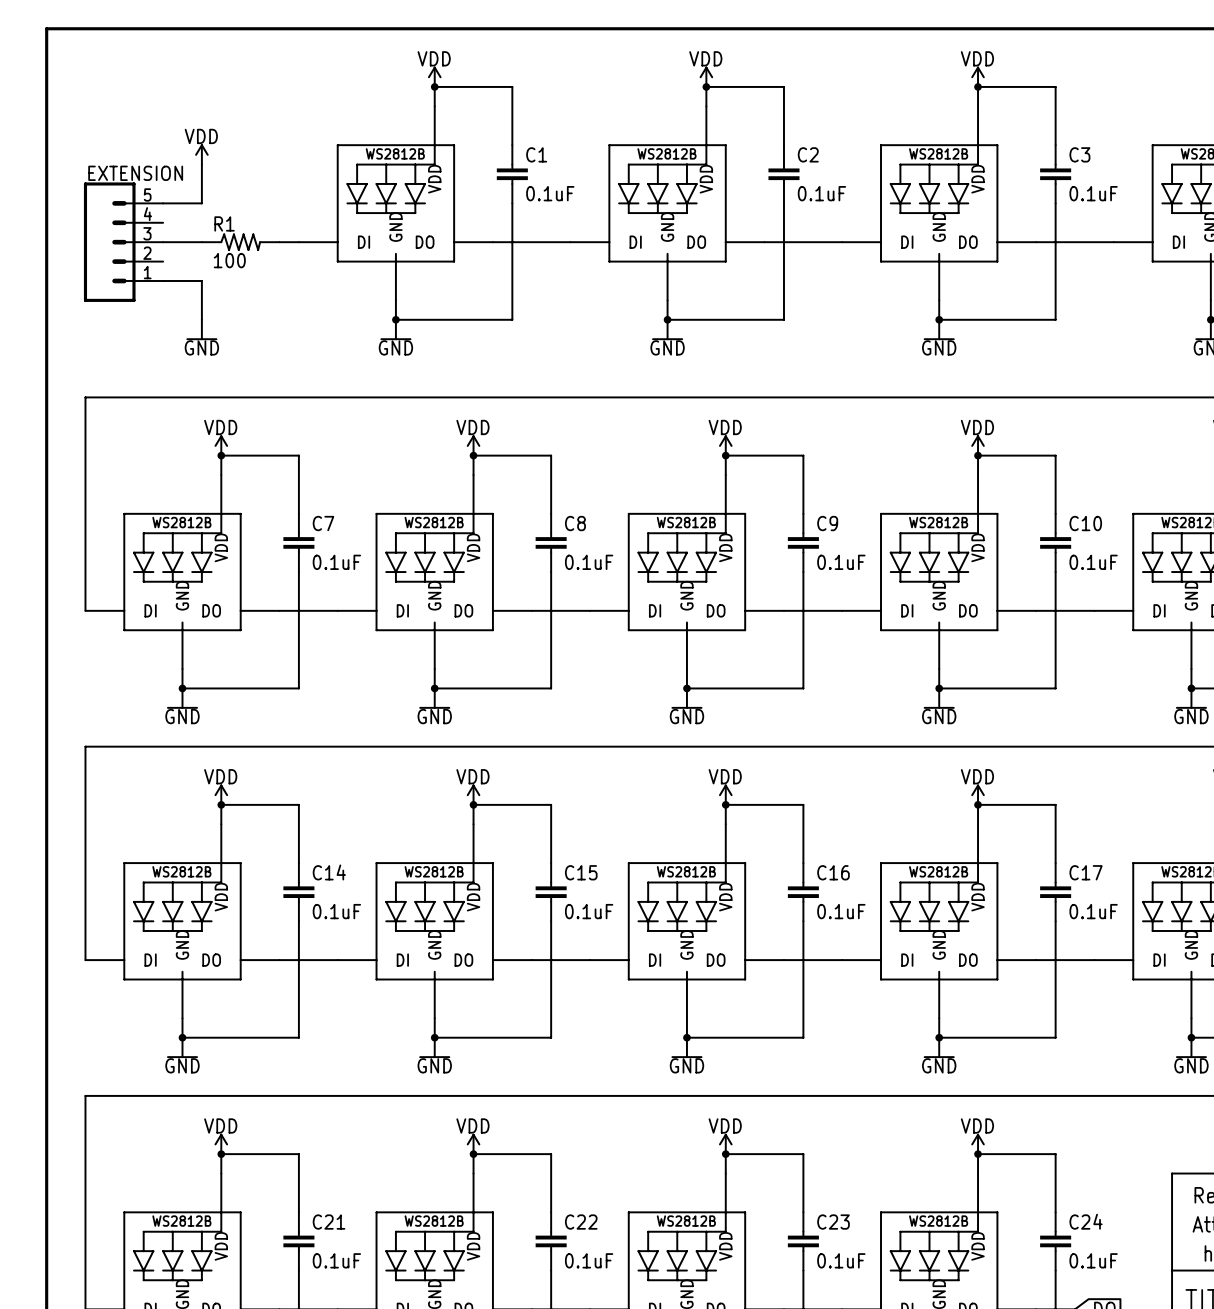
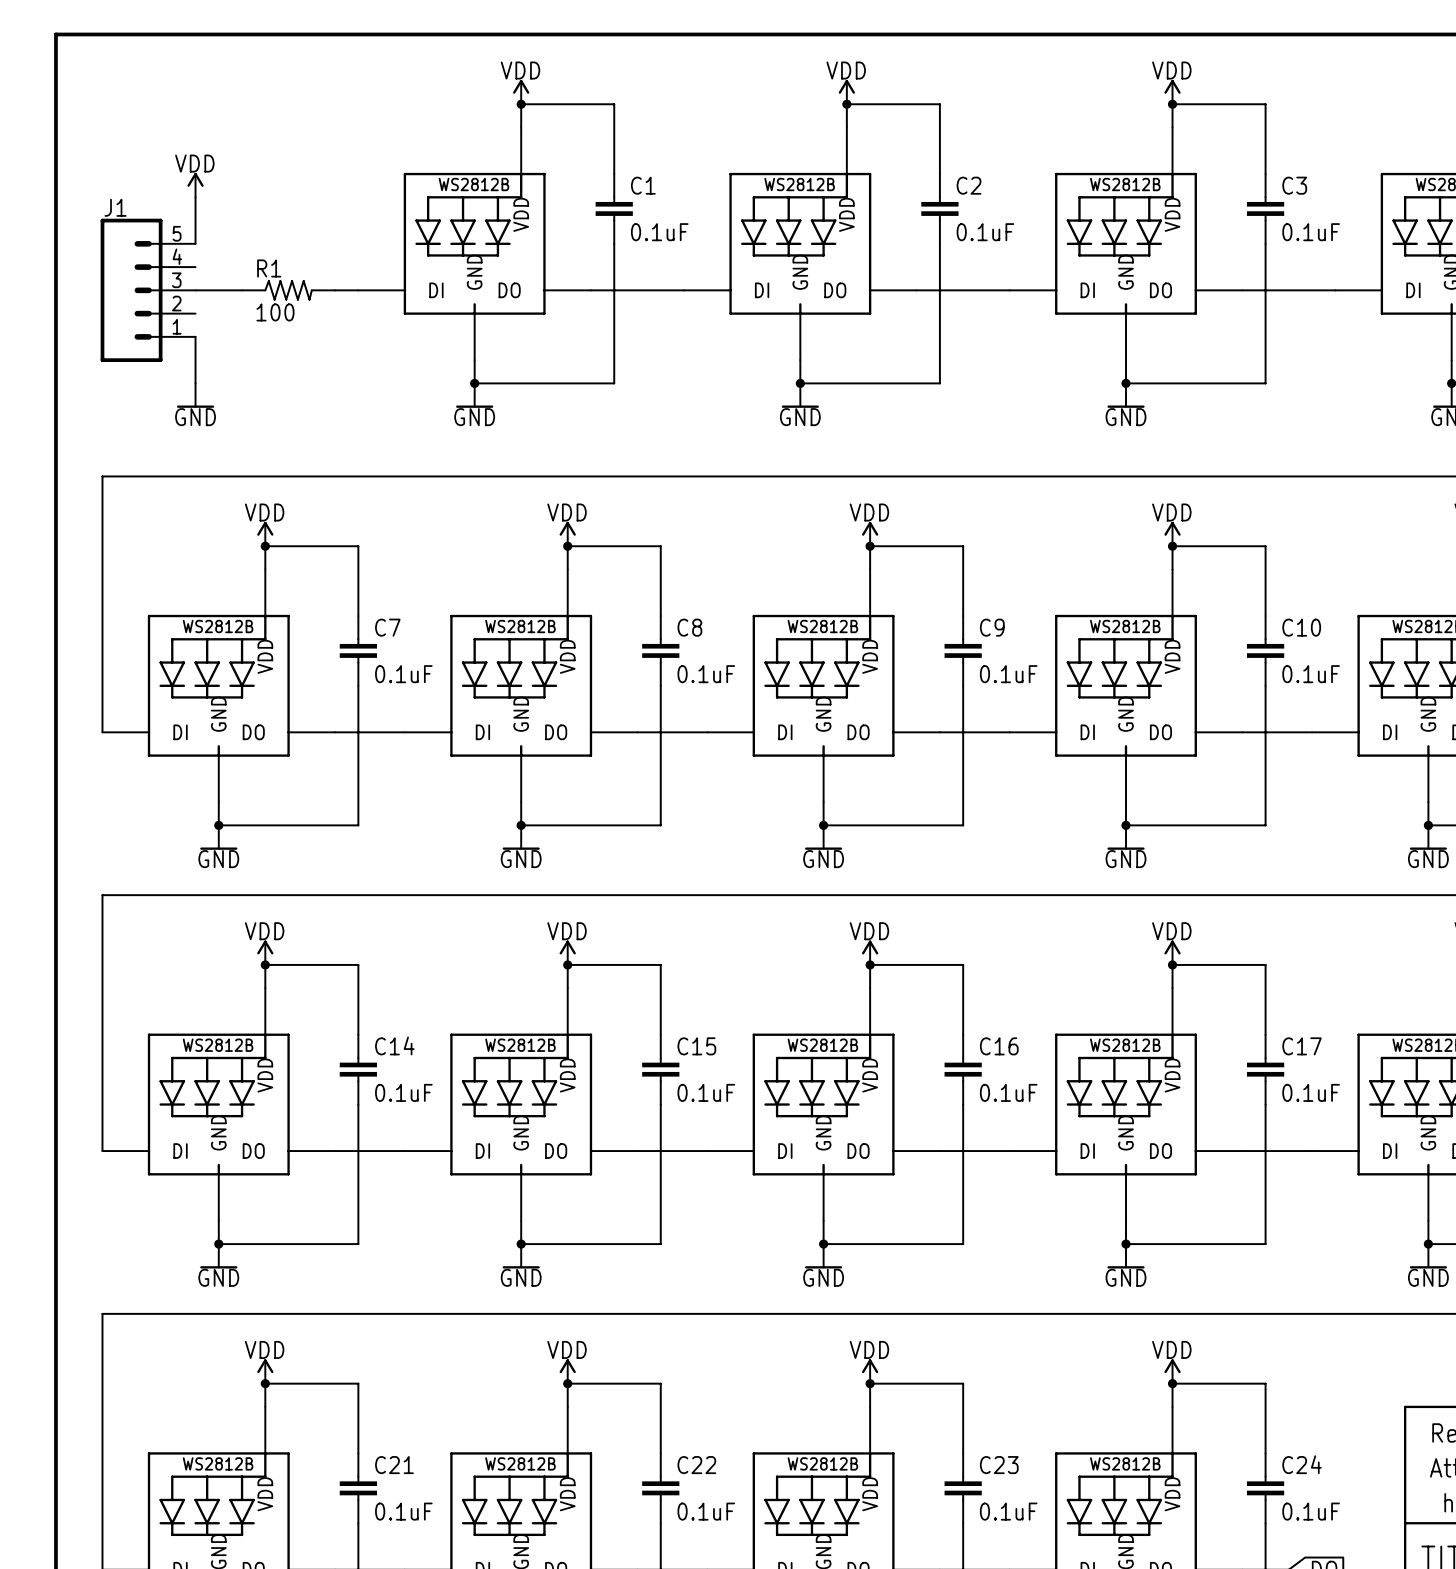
power symbol position: VDD (201, 154) -> VDD (195, 185)
wire: (201, 164) (201, 203) (163, 203) -> (195, 197) (195, 243)
EXTENSION name: EXTENSION (135, 173) -> J1 (115, 207)
wire: (163, 280) (201, 280) (201, 319) -> (195, 336) (195, 383)
power symbol position: GND (201, 329) -> GND (195, 395)

